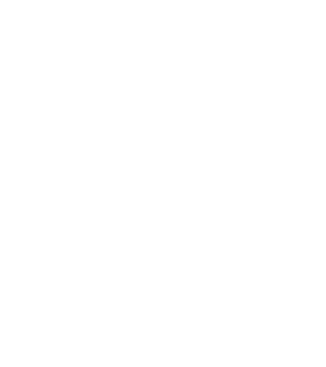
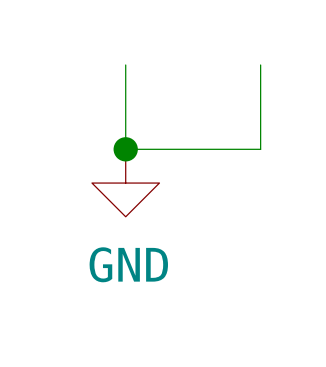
wire: none -> (125, 64) (125, 149) (260, 149) (260, 64)
junction: none -> (125, 149)
power symbol: none -> GND (125, 183)

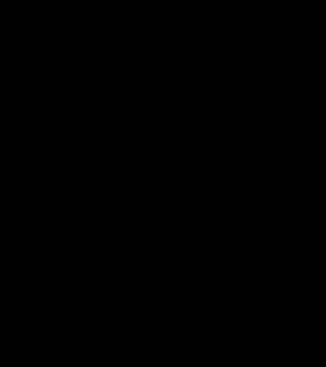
wire: (125, 64) (125, 149) (260, 149) (260, 64) -> none
junction: (125, 149) -> none
power symbol: GND (125, 183) -> none

